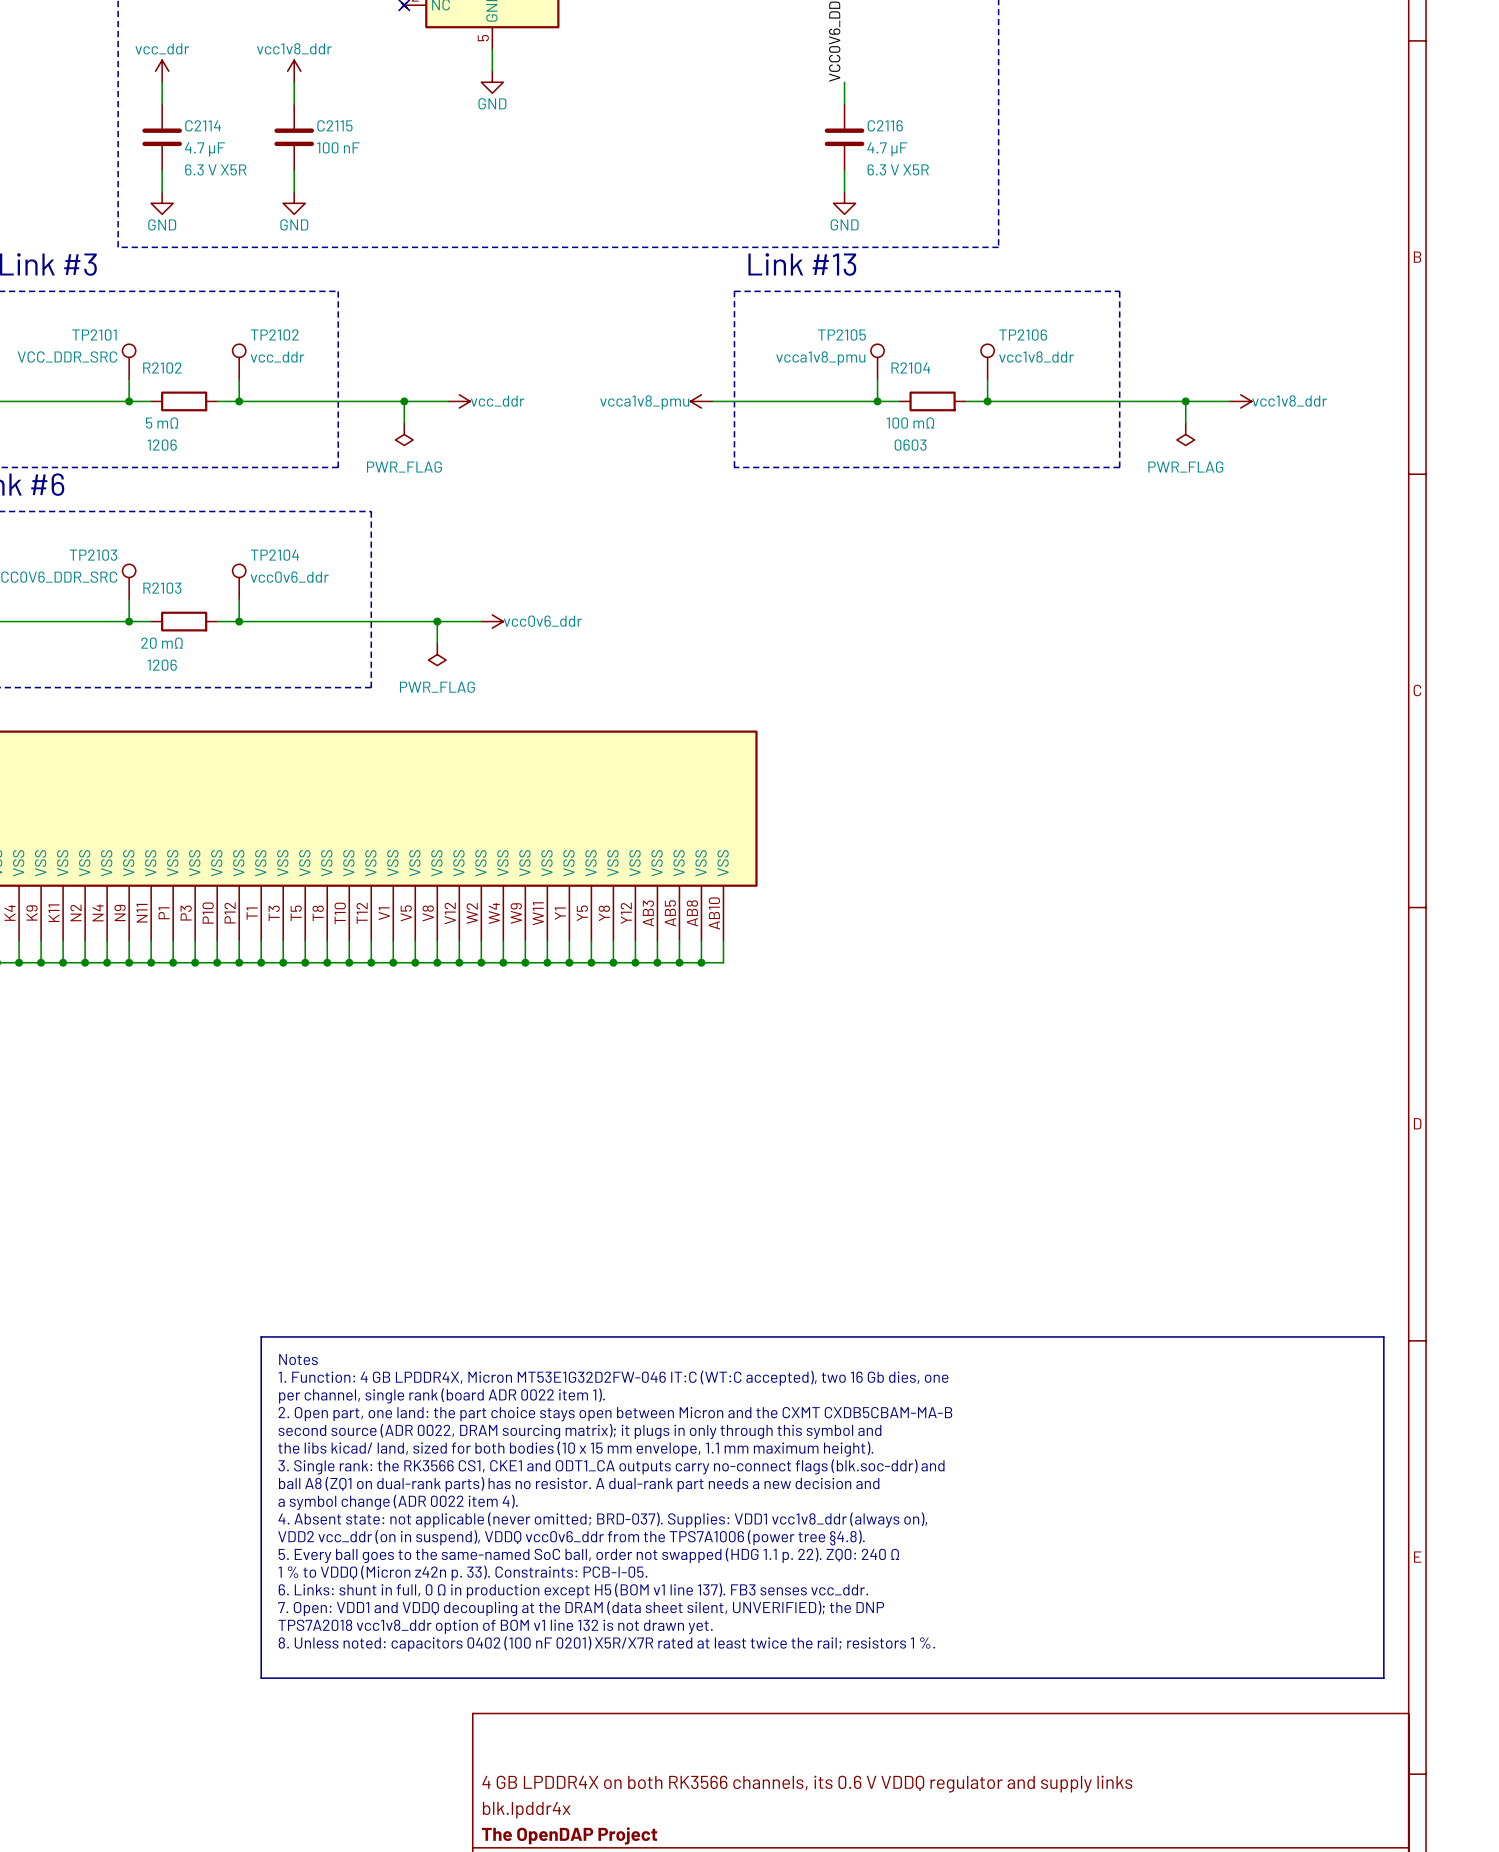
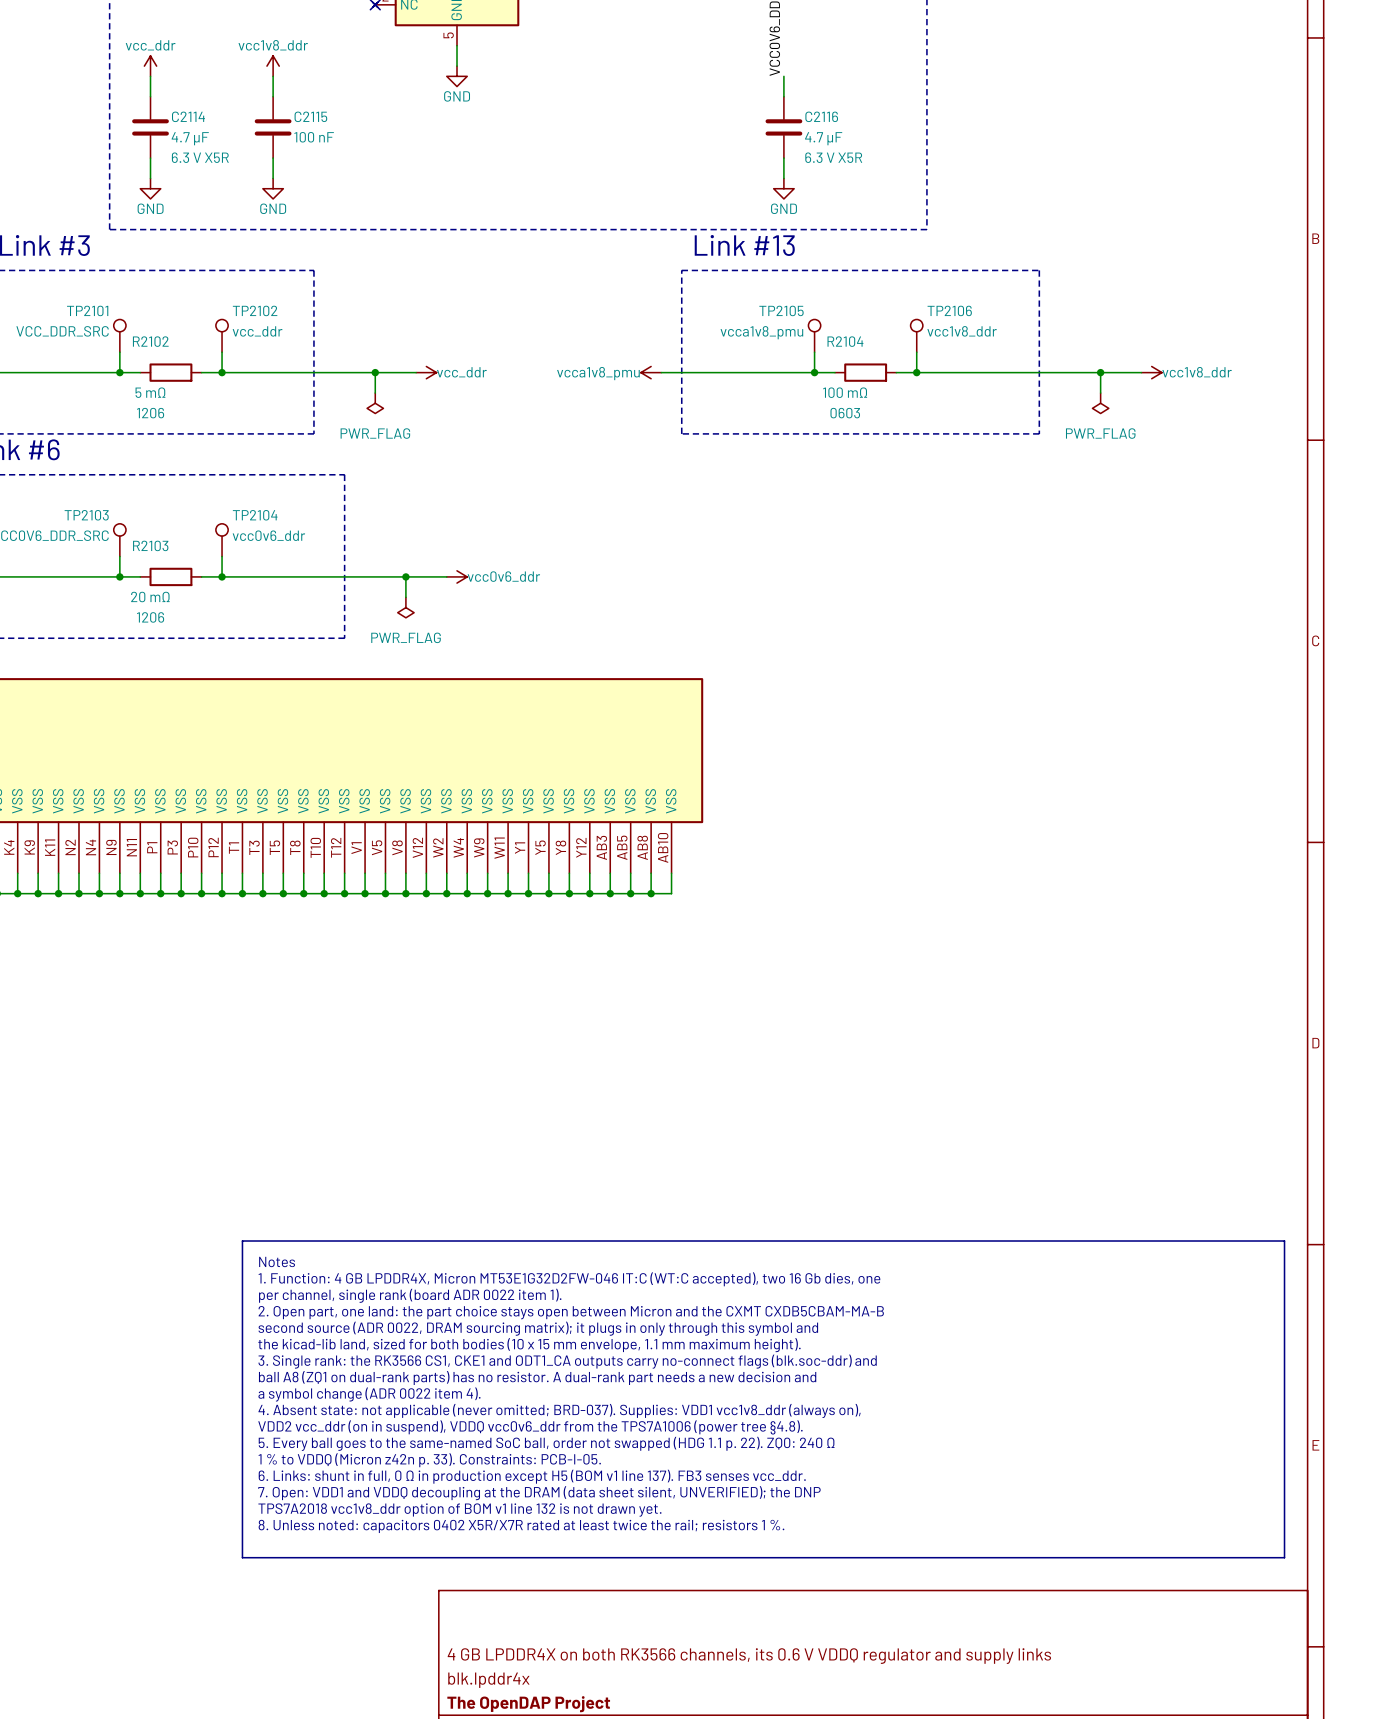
text: the libs kicad/ land, sized for both bodies (10 x 15 mm envelope, 1.1 mm maximum height). (575, 1449) -> the kicad-lib land, sized for both bodies (10 x 15 mm envelope, 1.1 mm maximum height). (529, 1345)
text: 8. Unless noted: capacitors 0402 (100 nF 0201) X5R/X7R rated at least twice the rail; resistors 1 %. (606, 1644) -> 8. Unless noted: capacitors 0402 X5R/X7R rated at least twice the rail; resistors 1 %. (521, 1526)

